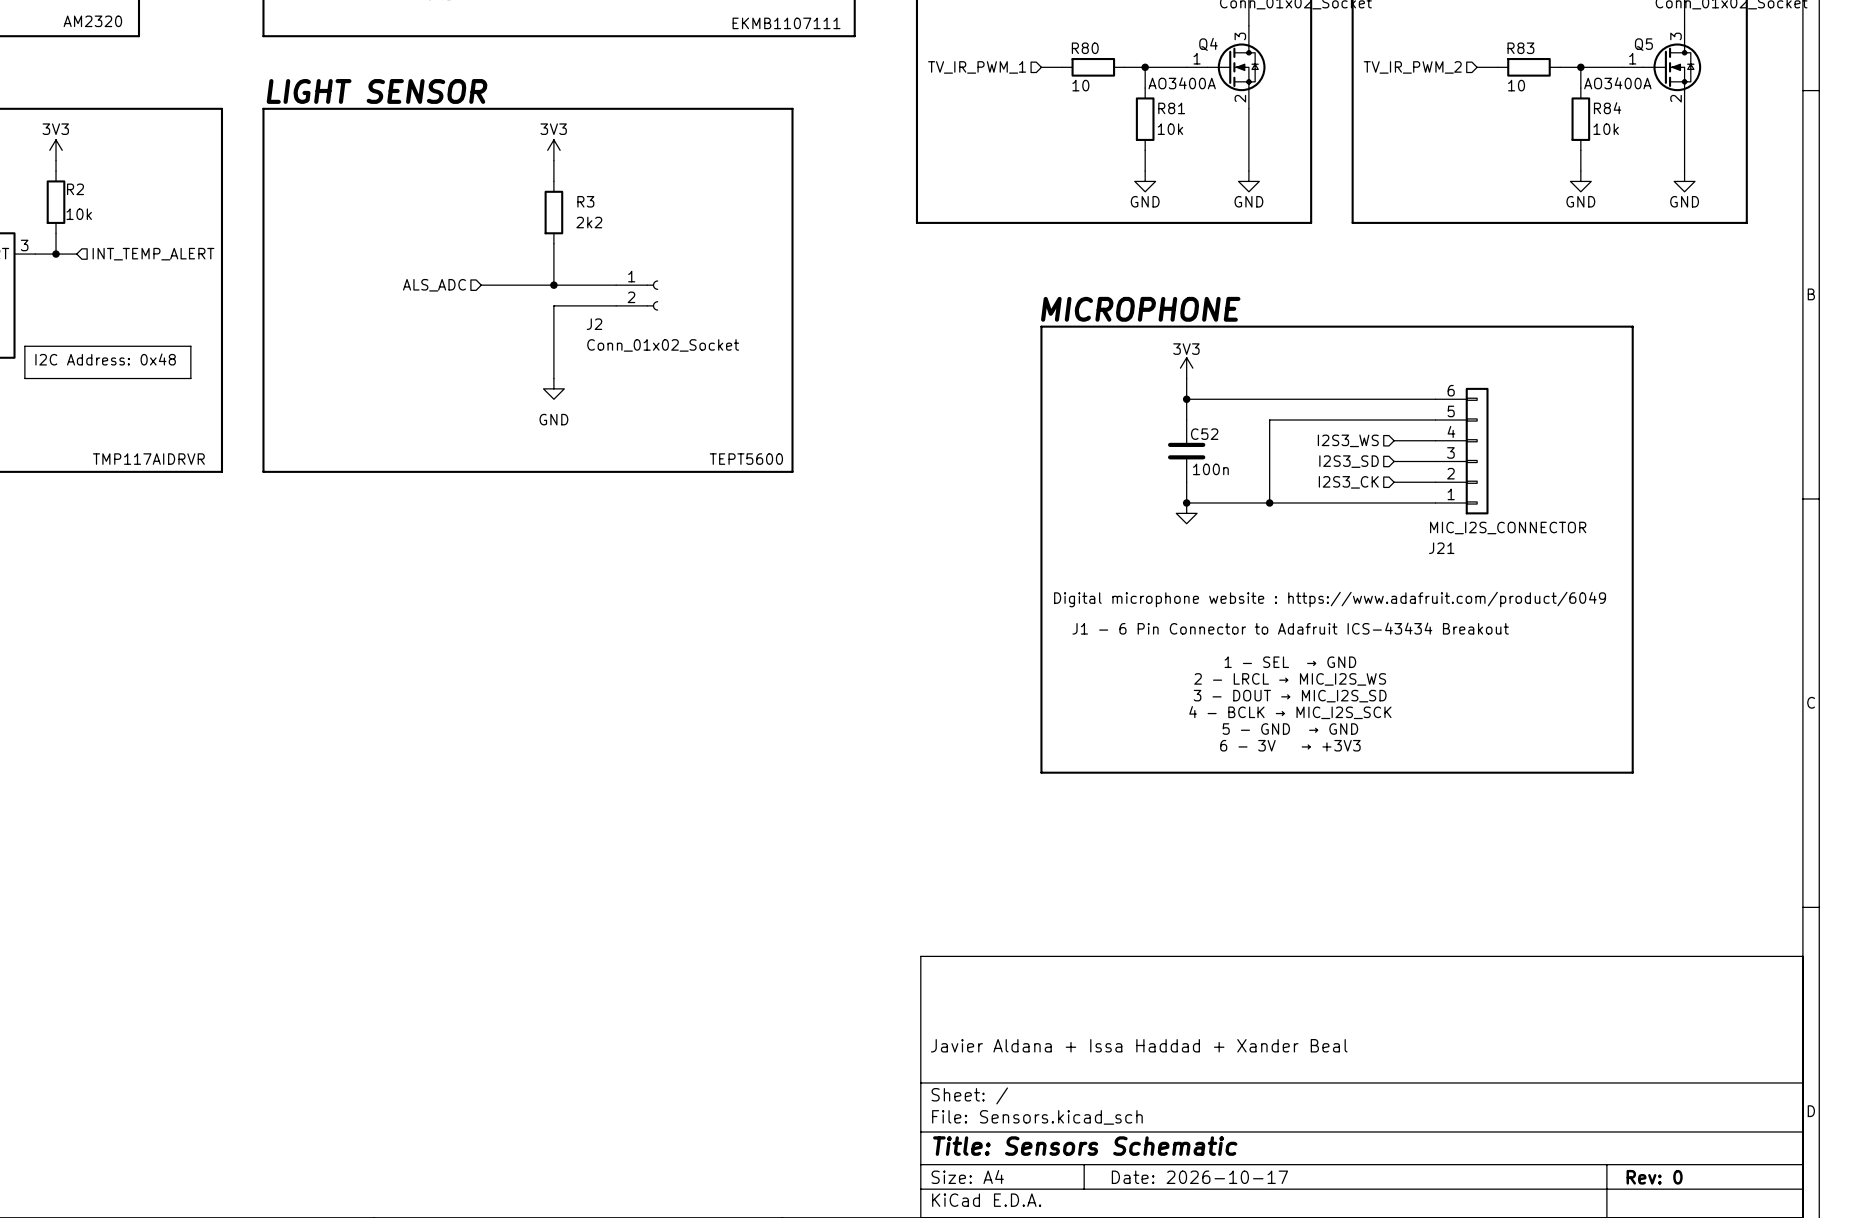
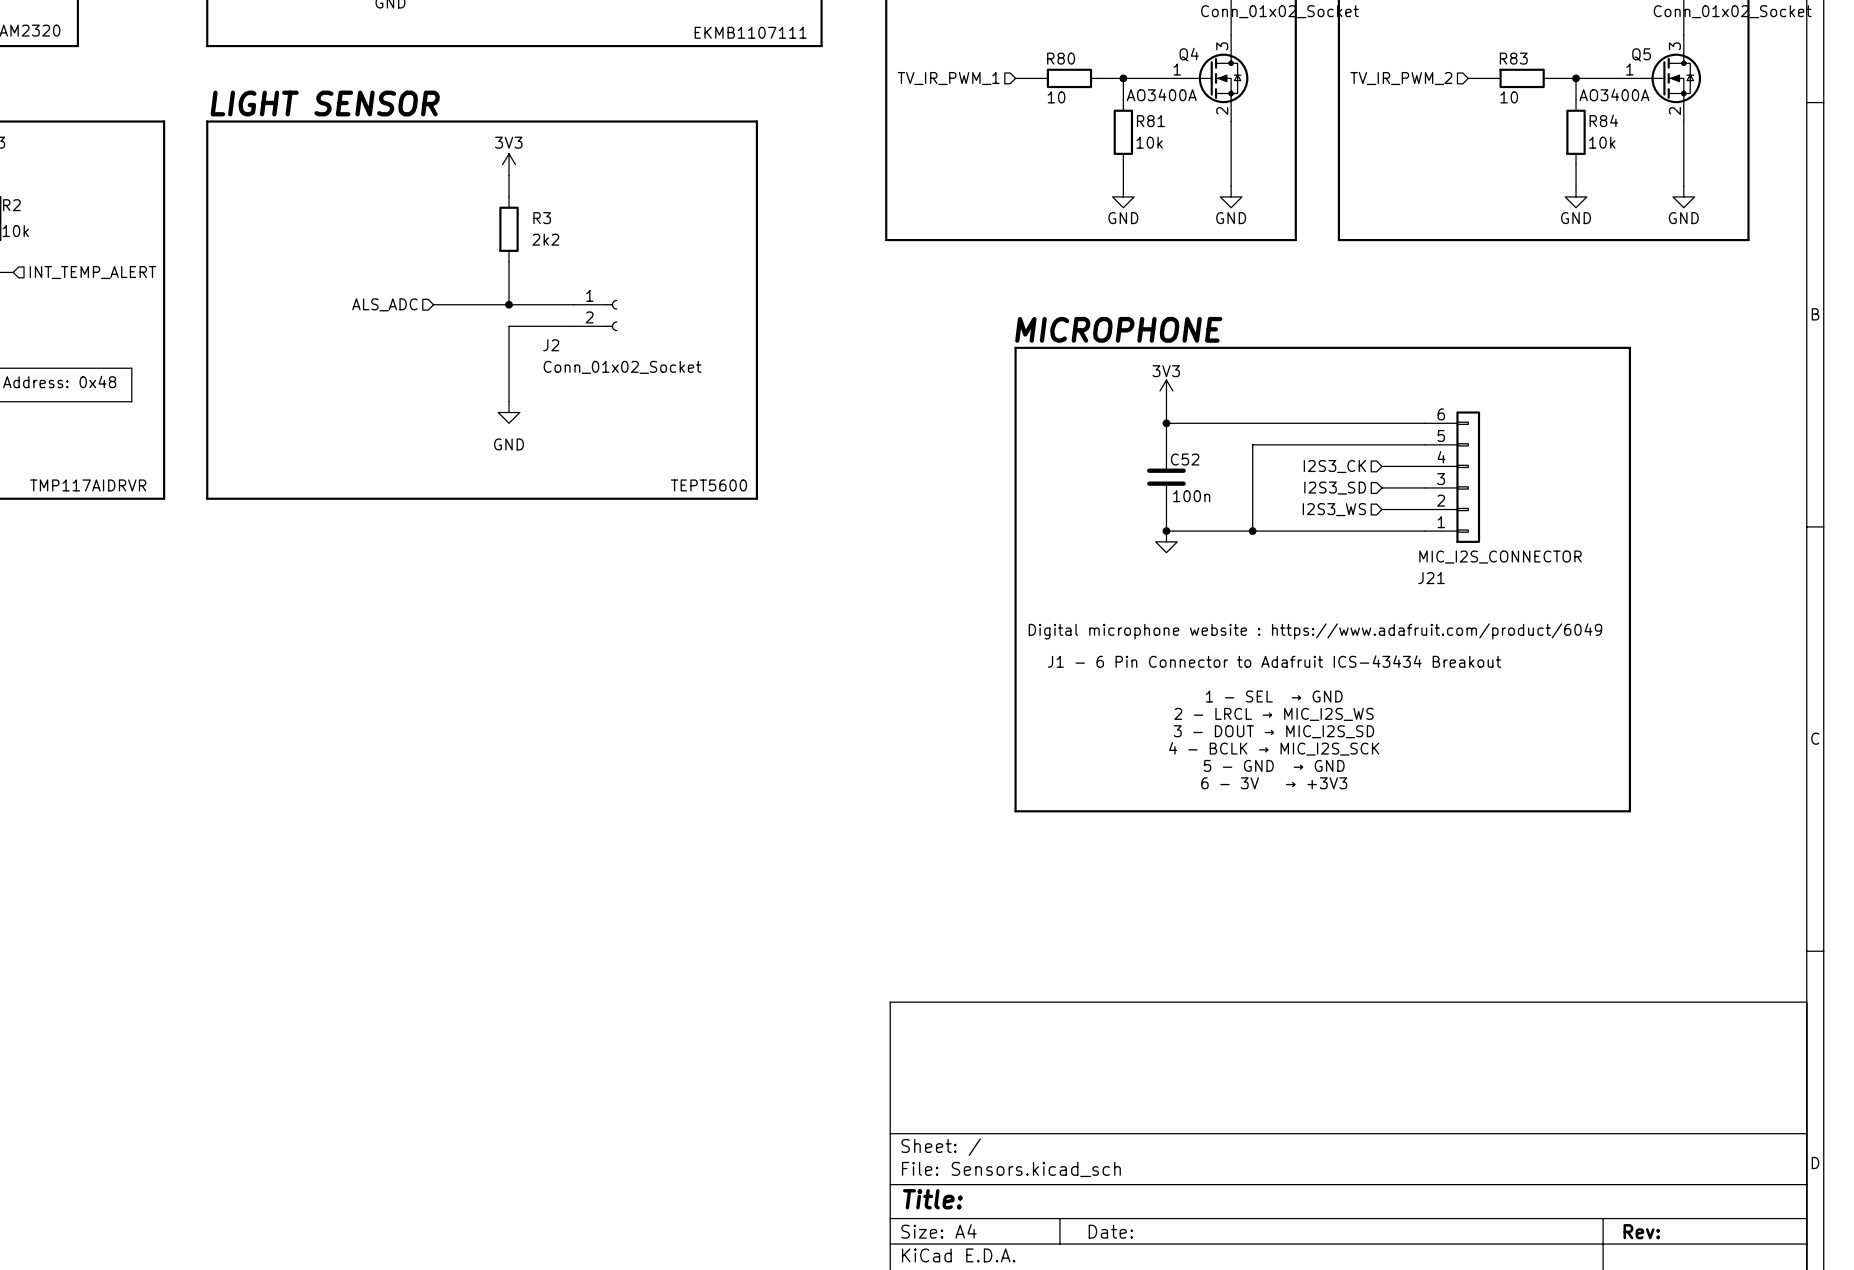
hierarchical label: I2S3_WS (1348, 440) -> I2S3_CK (1334, 466)
hierarchical label: I2S3_CK (1348, 482) -> I2S3_WS (1334, 509)
title block: Javier Aldana + Issa Haddad + Xander Beal (1139, 1045) -> none
title block: Title: Sensors Schematic (1085, 1146) -> Title: (932, 1199)
title block: Date: 2026-10-17 (1199, 1177) -> Date: (1110, 1231)
title block: Rev: 0 (1654, 1177) -> Rev: (1641, 1231)

